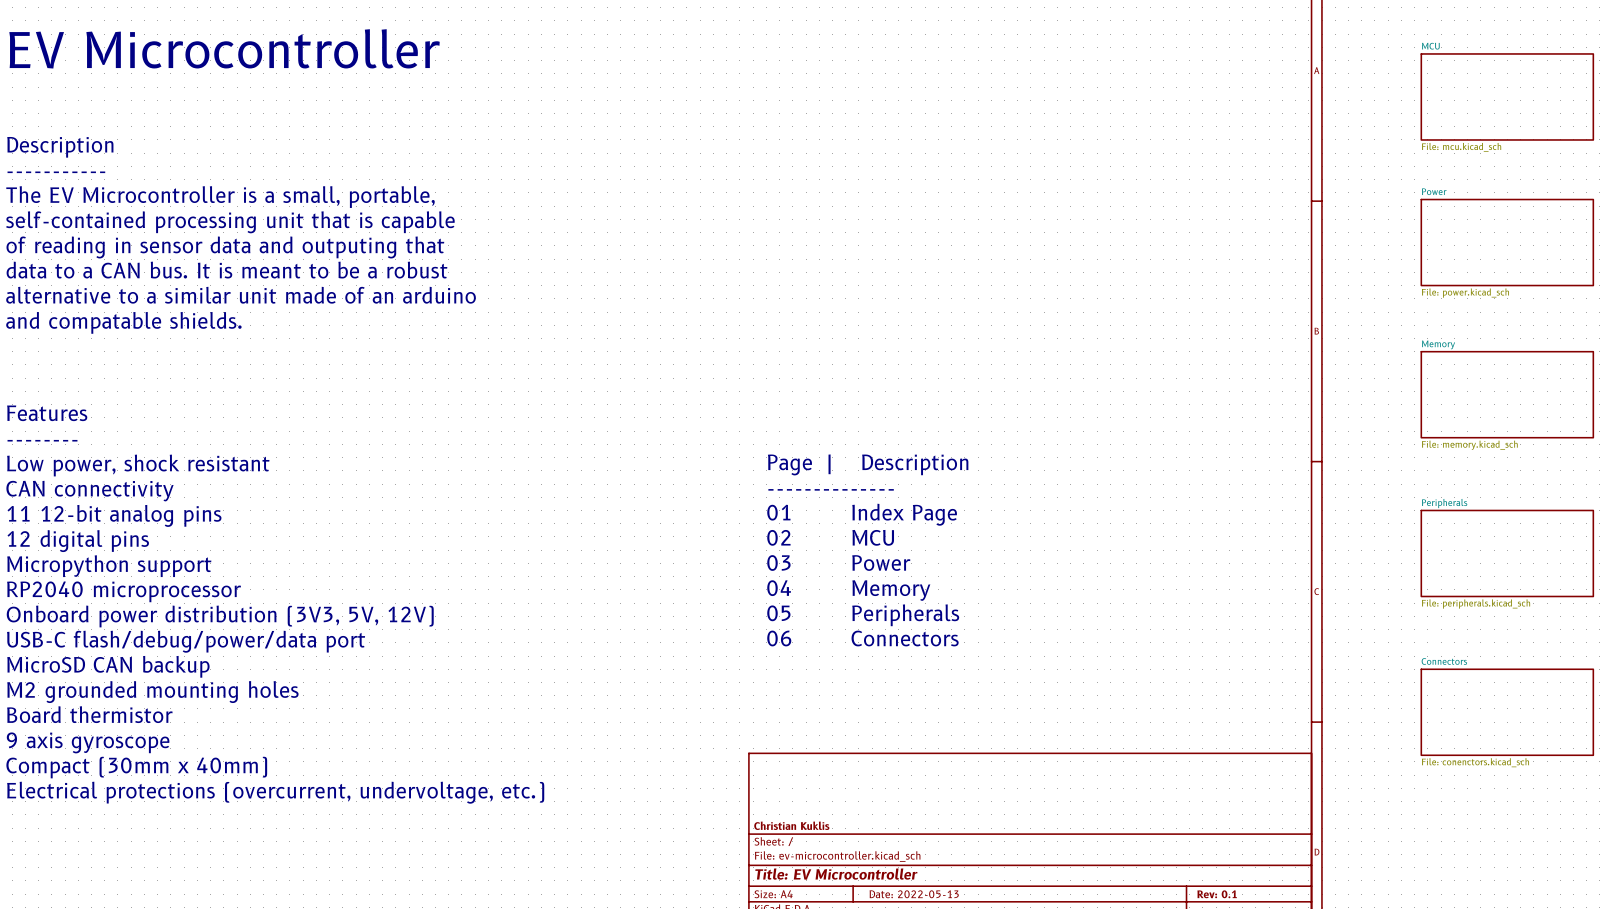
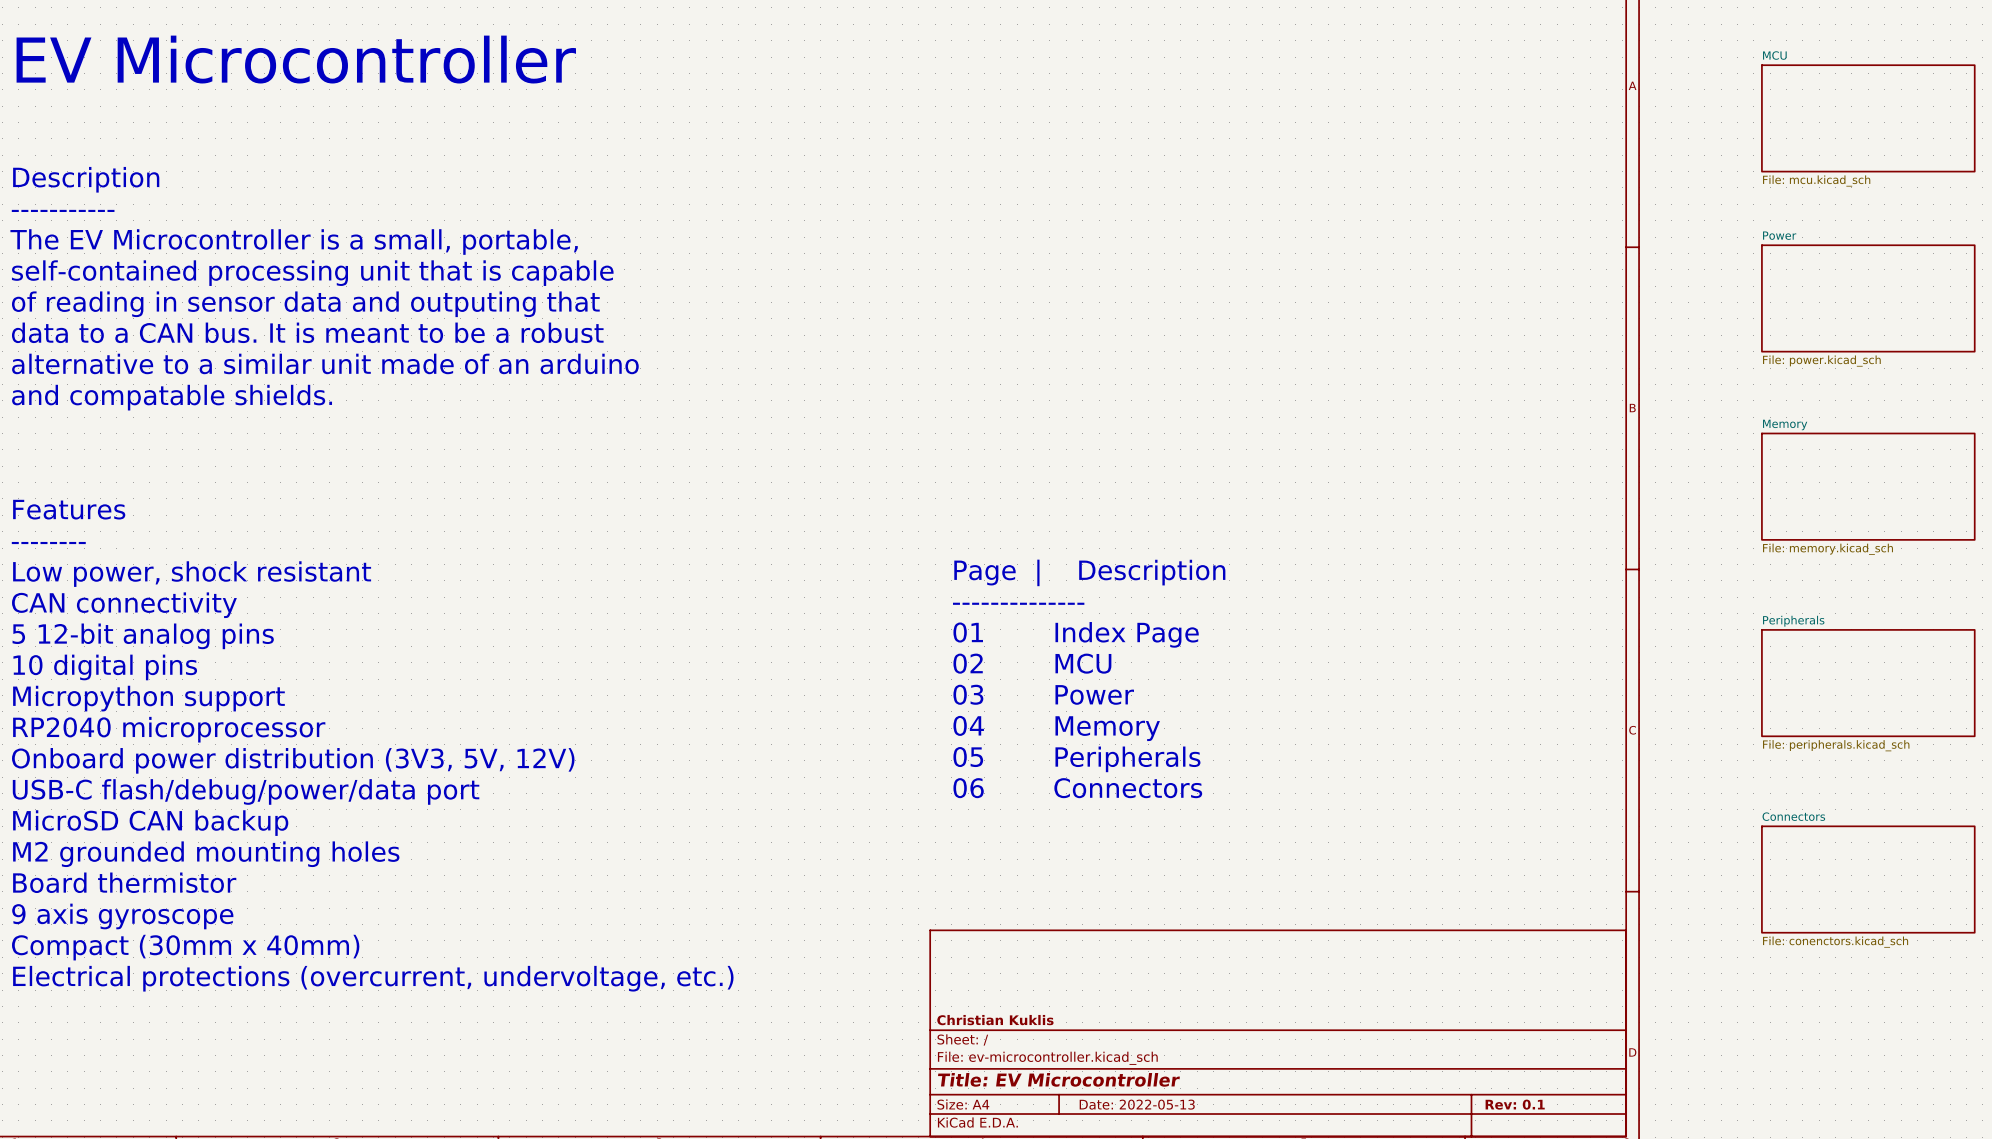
text: 11 12-bit analog pins (114, 515) -> 5 12-bit analog pins (143, 636)
text: 12 digital pins (78, 541) -> 10 digital pins (105, 667)

